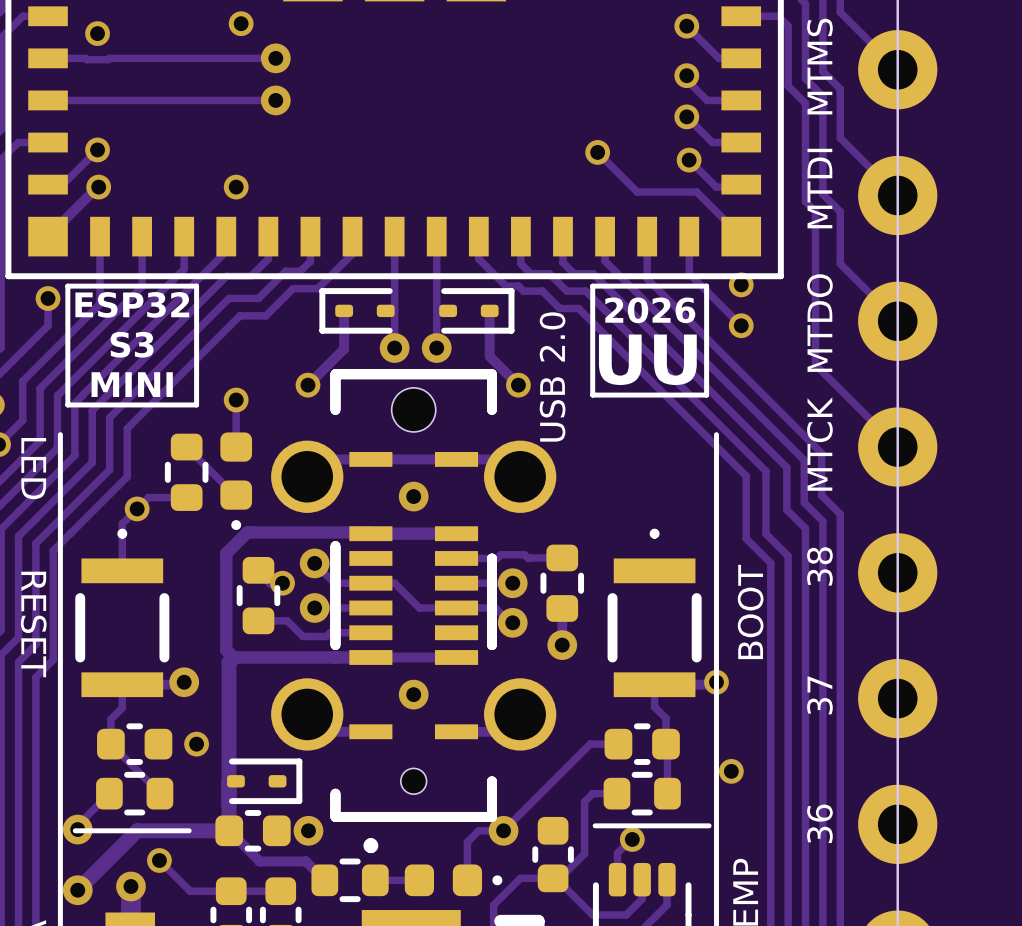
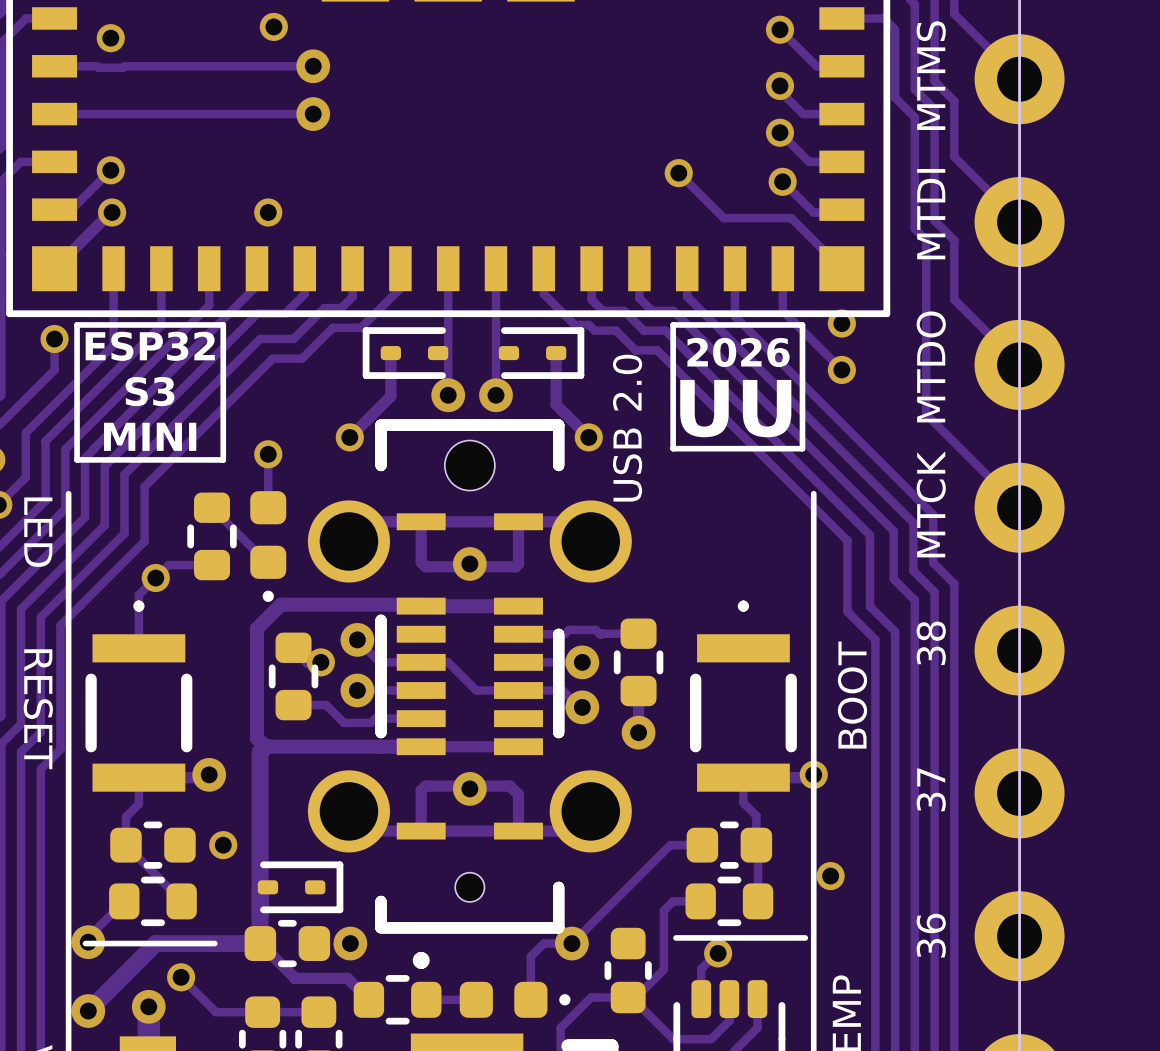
track: none -> (421, 521) (421, 562) (425, 566) (467, 566) (469, 563) (472, 566) (515, 566) (518, 563) (518, 521)
track: none -> (425, 786) (467, 786) (469, 788) (472, 786) (510, 786) (518, 794) (518, 831) (421, 831) (421, 790) (425, 786)

